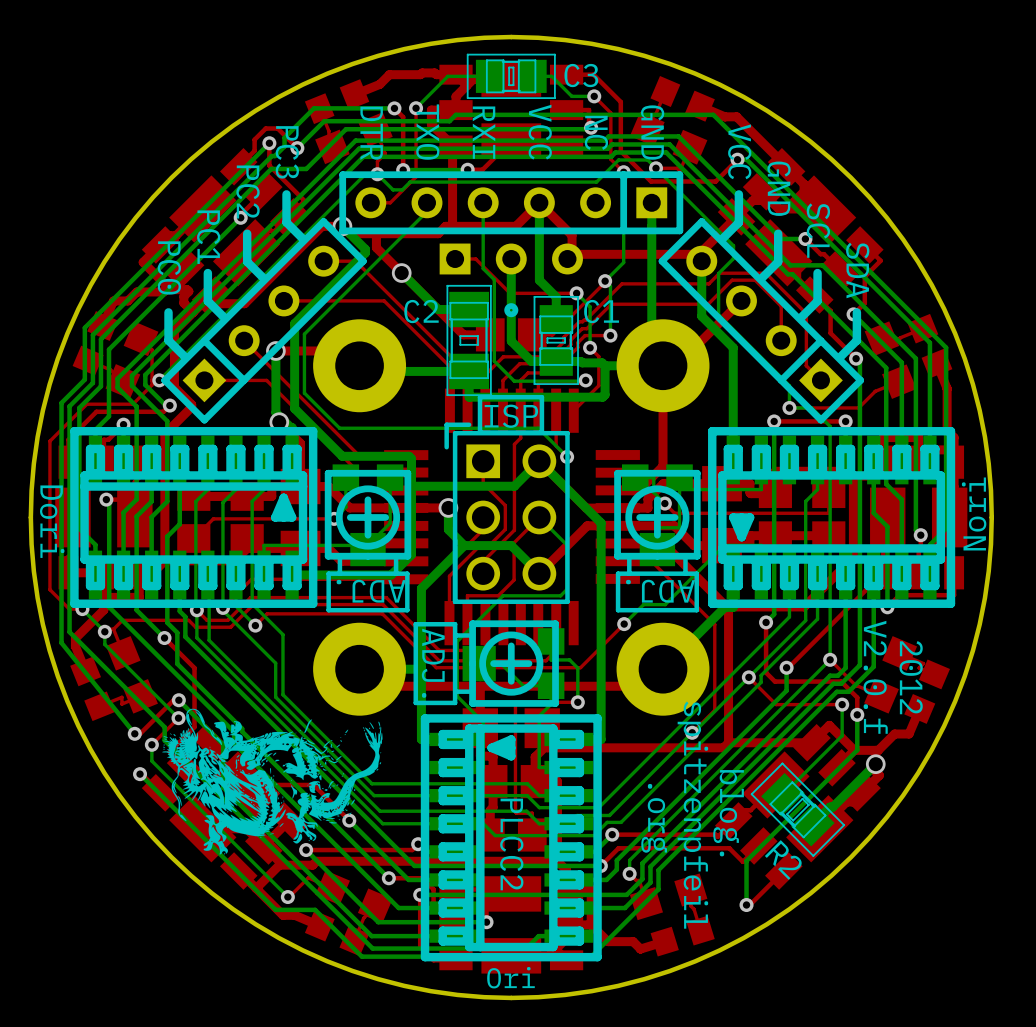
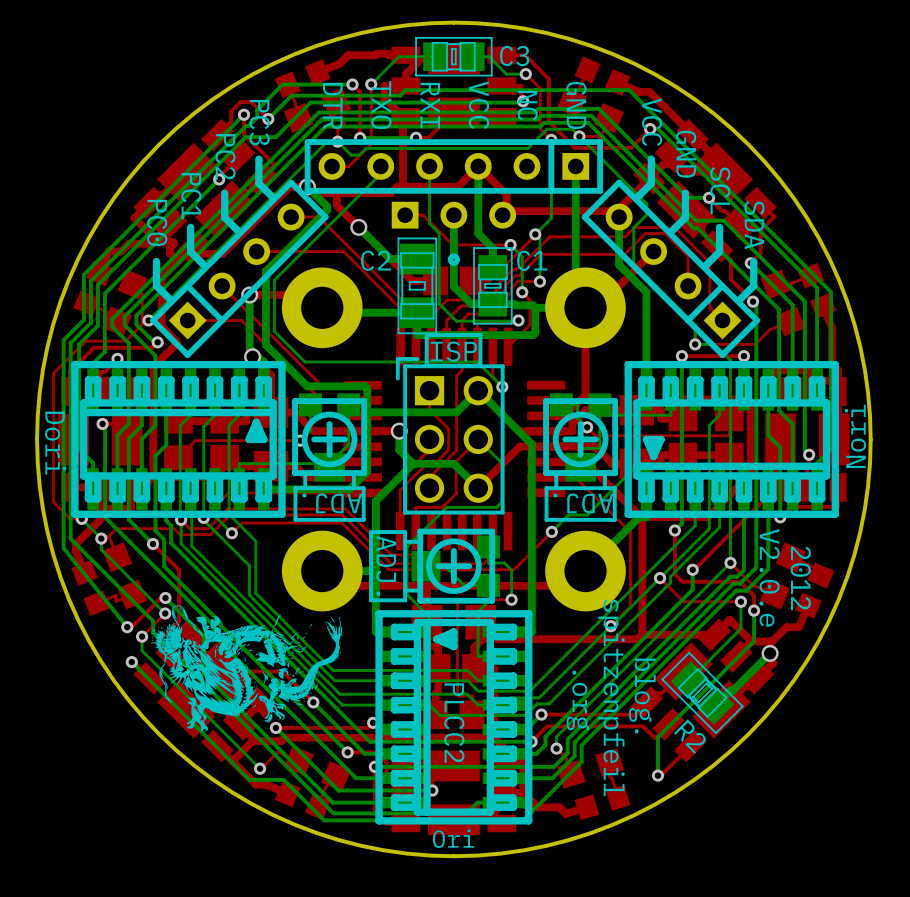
text: V2.0.f (875, 677) -> V2.0.e (769, 577)

